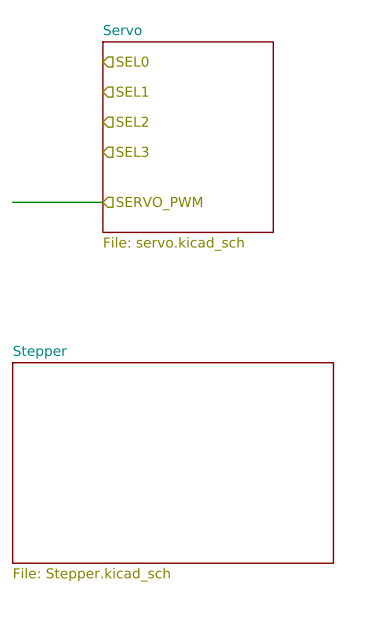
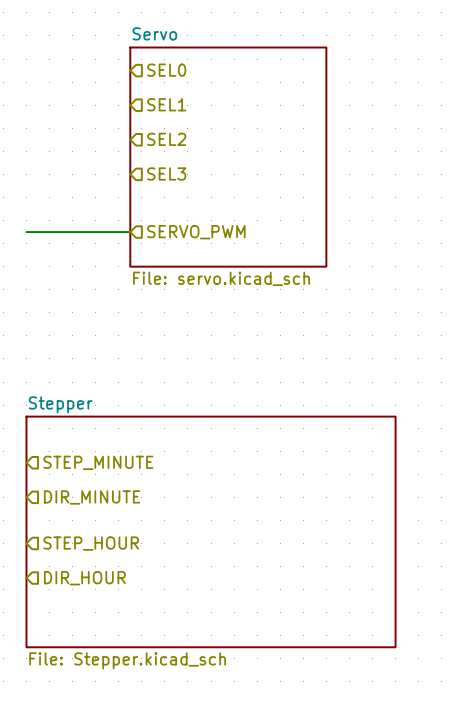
hierarchical label: none -> STEP_MINUTE (98, 462)
hierarchical label: none -> DIR_MINUTE (92, 497)
hierarchical label: none -> STEP_HOUR (91, 543)
hierarchical label: none -> DIR_HOUR (84, 578)

